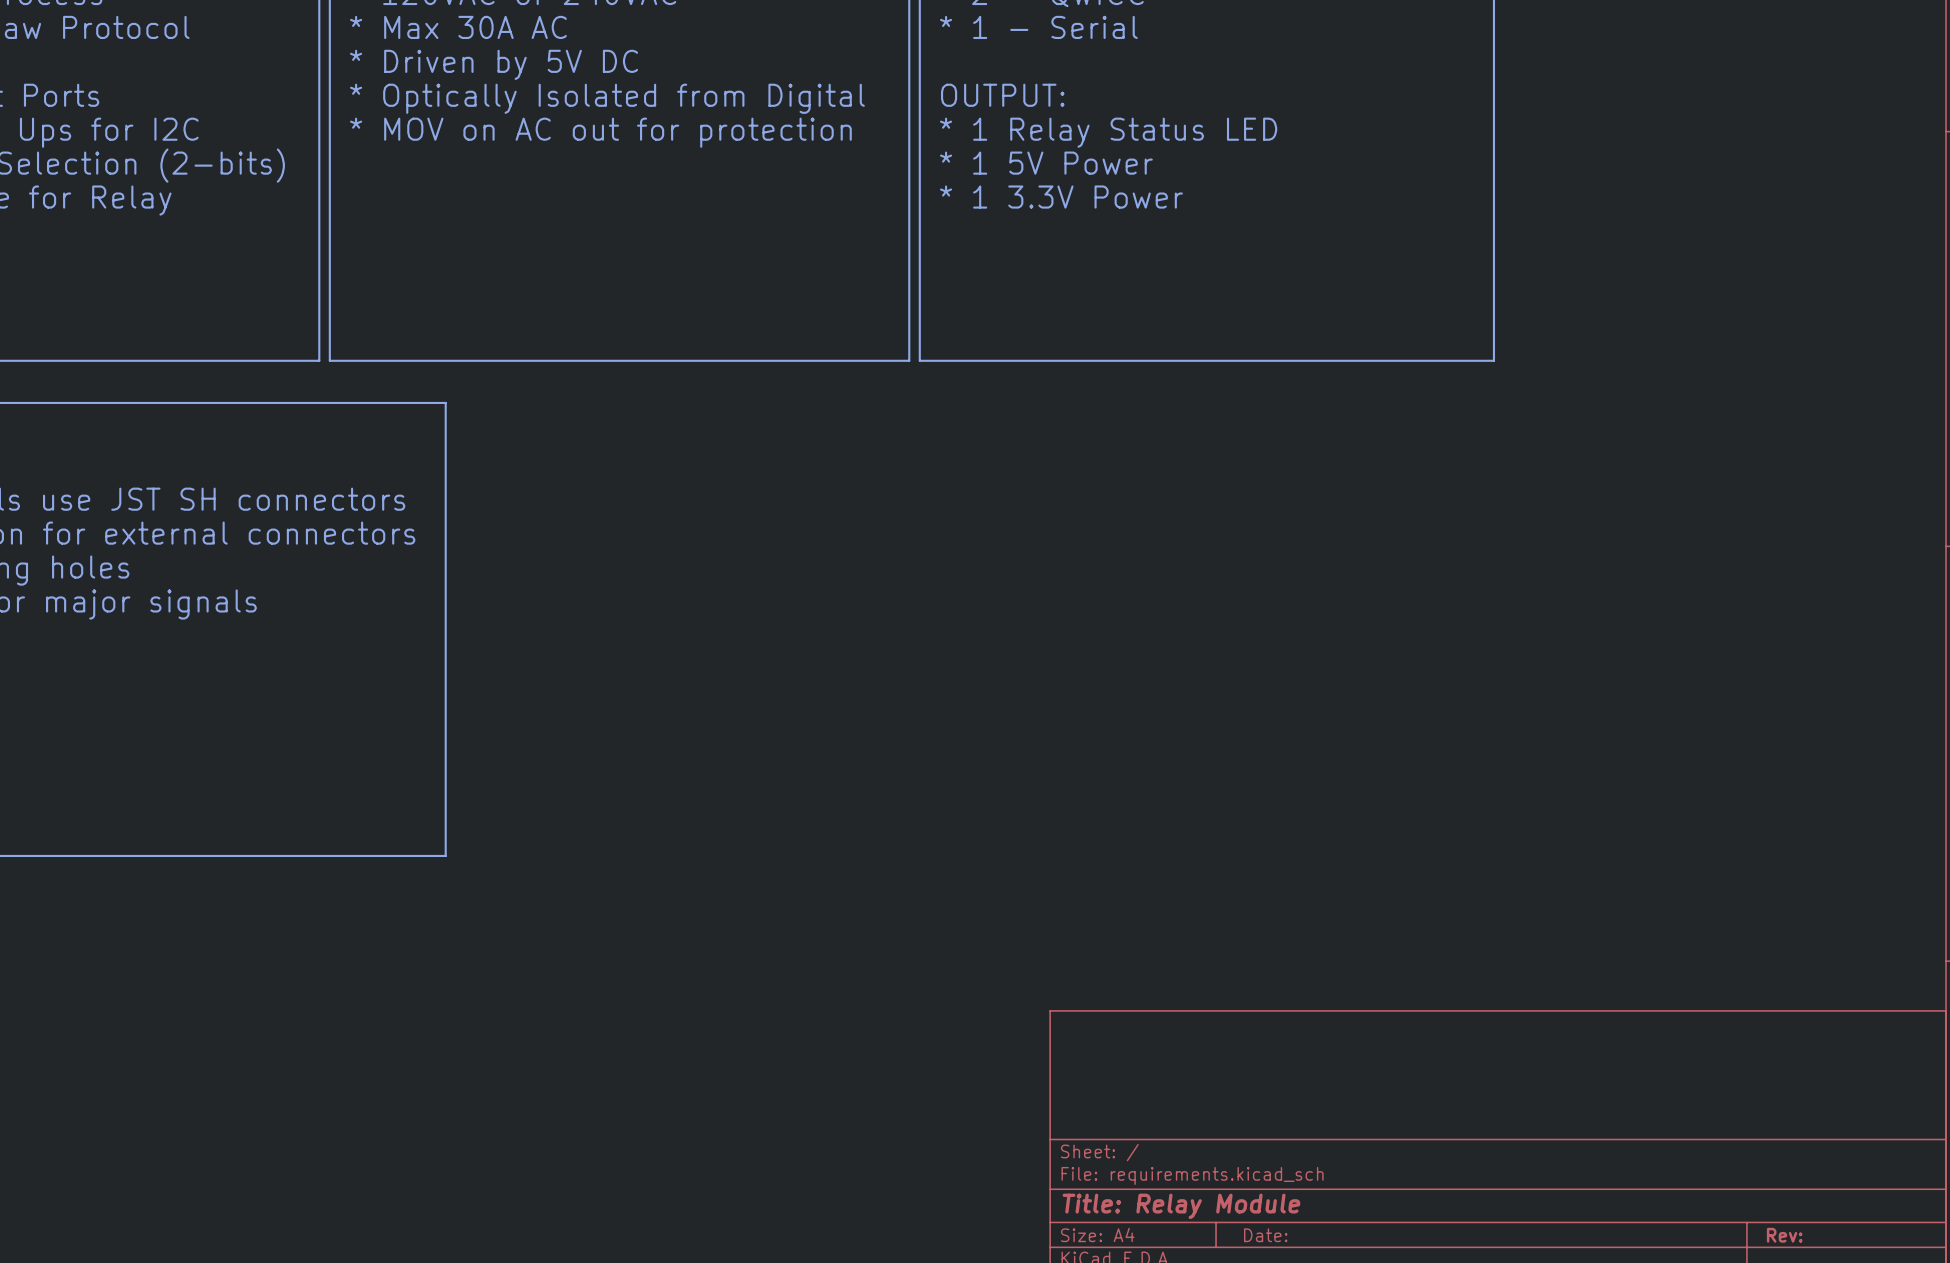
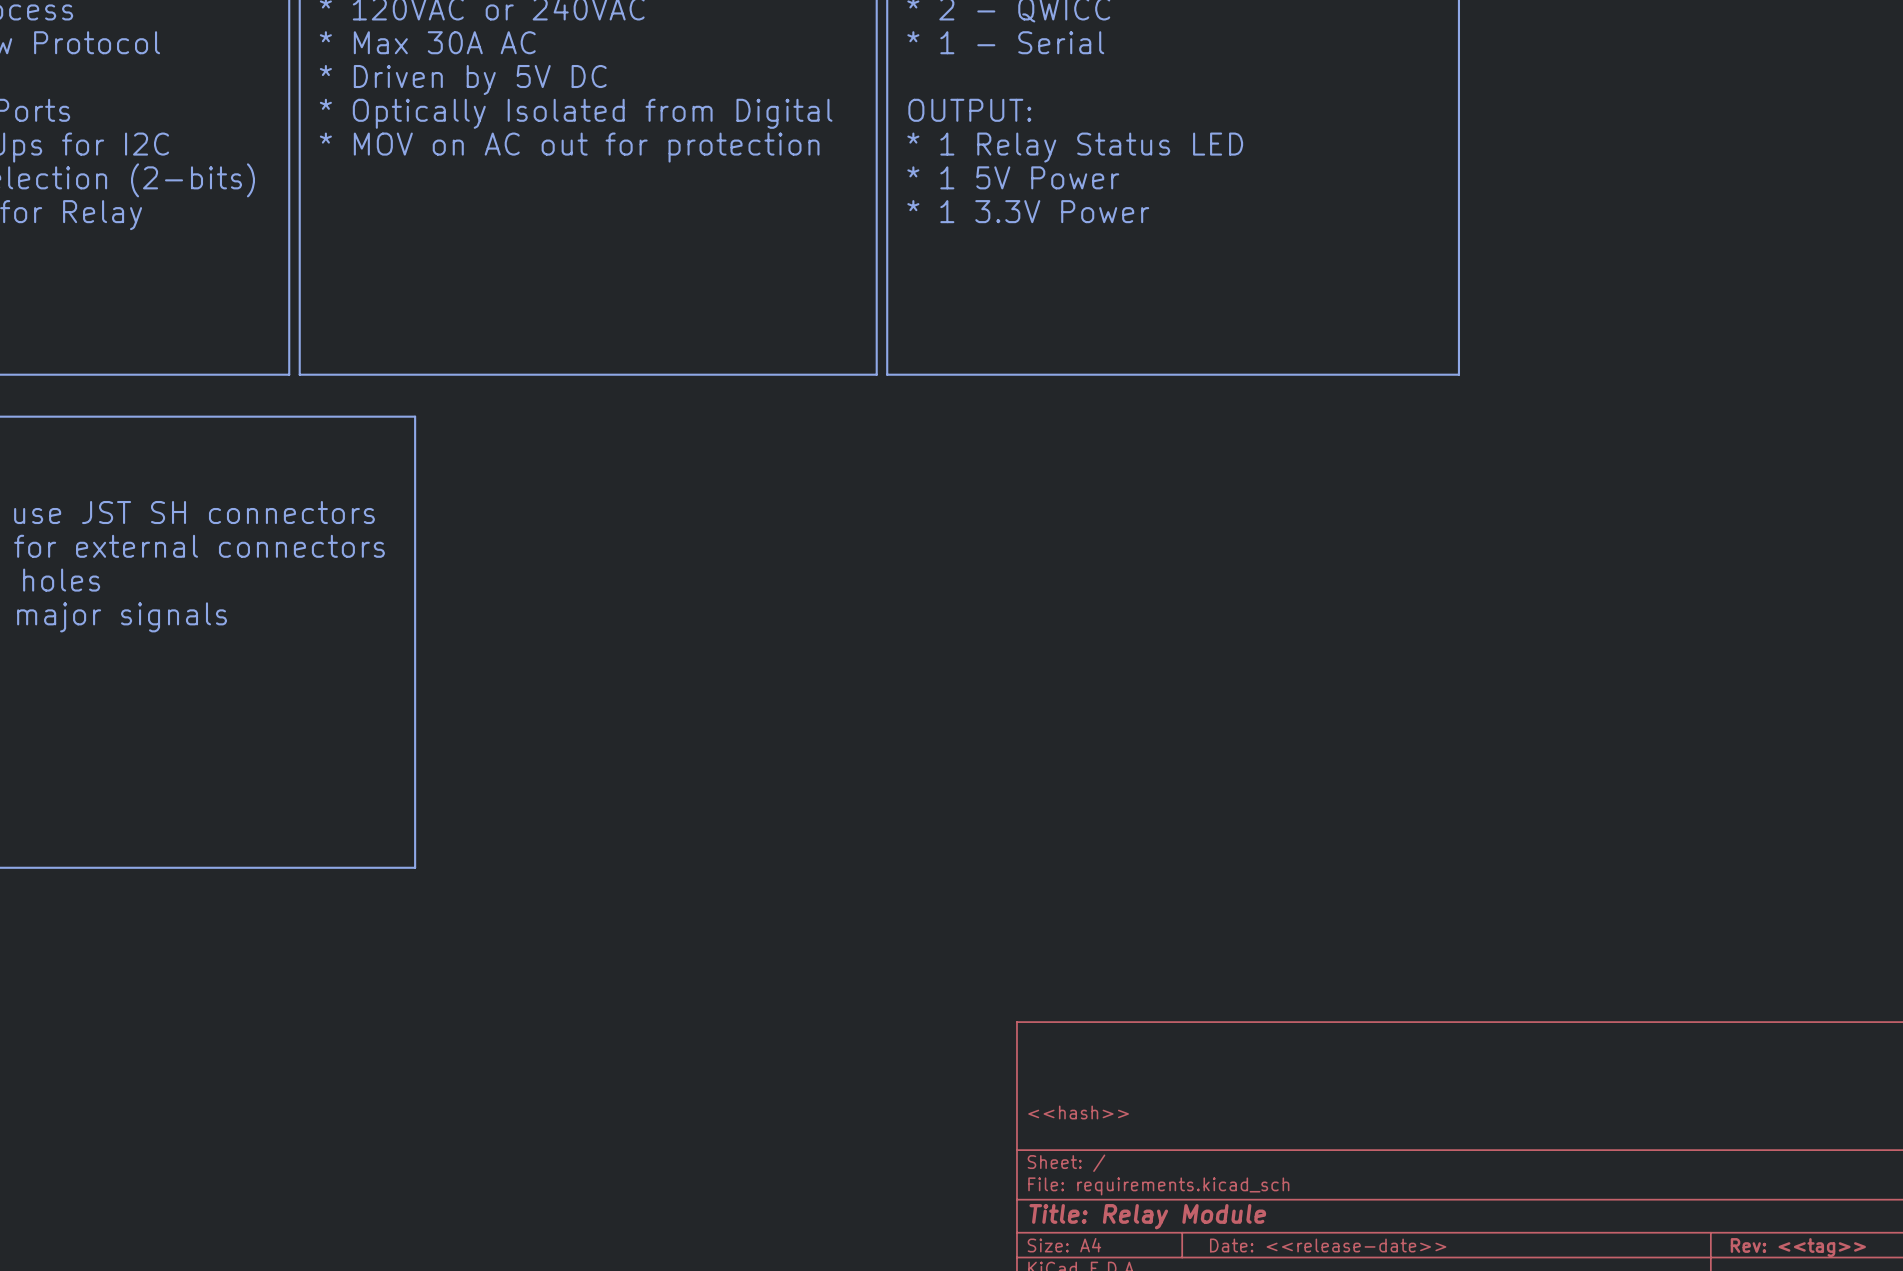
title block: none -> <<hash>> (1078, 1112)
title block: Date: (1265, 1235) -> Date: <<release-date>> (1328, 1245)
title block: Rev: (1784, 1235) -> Rev: <<tag>> (1798, 1247)

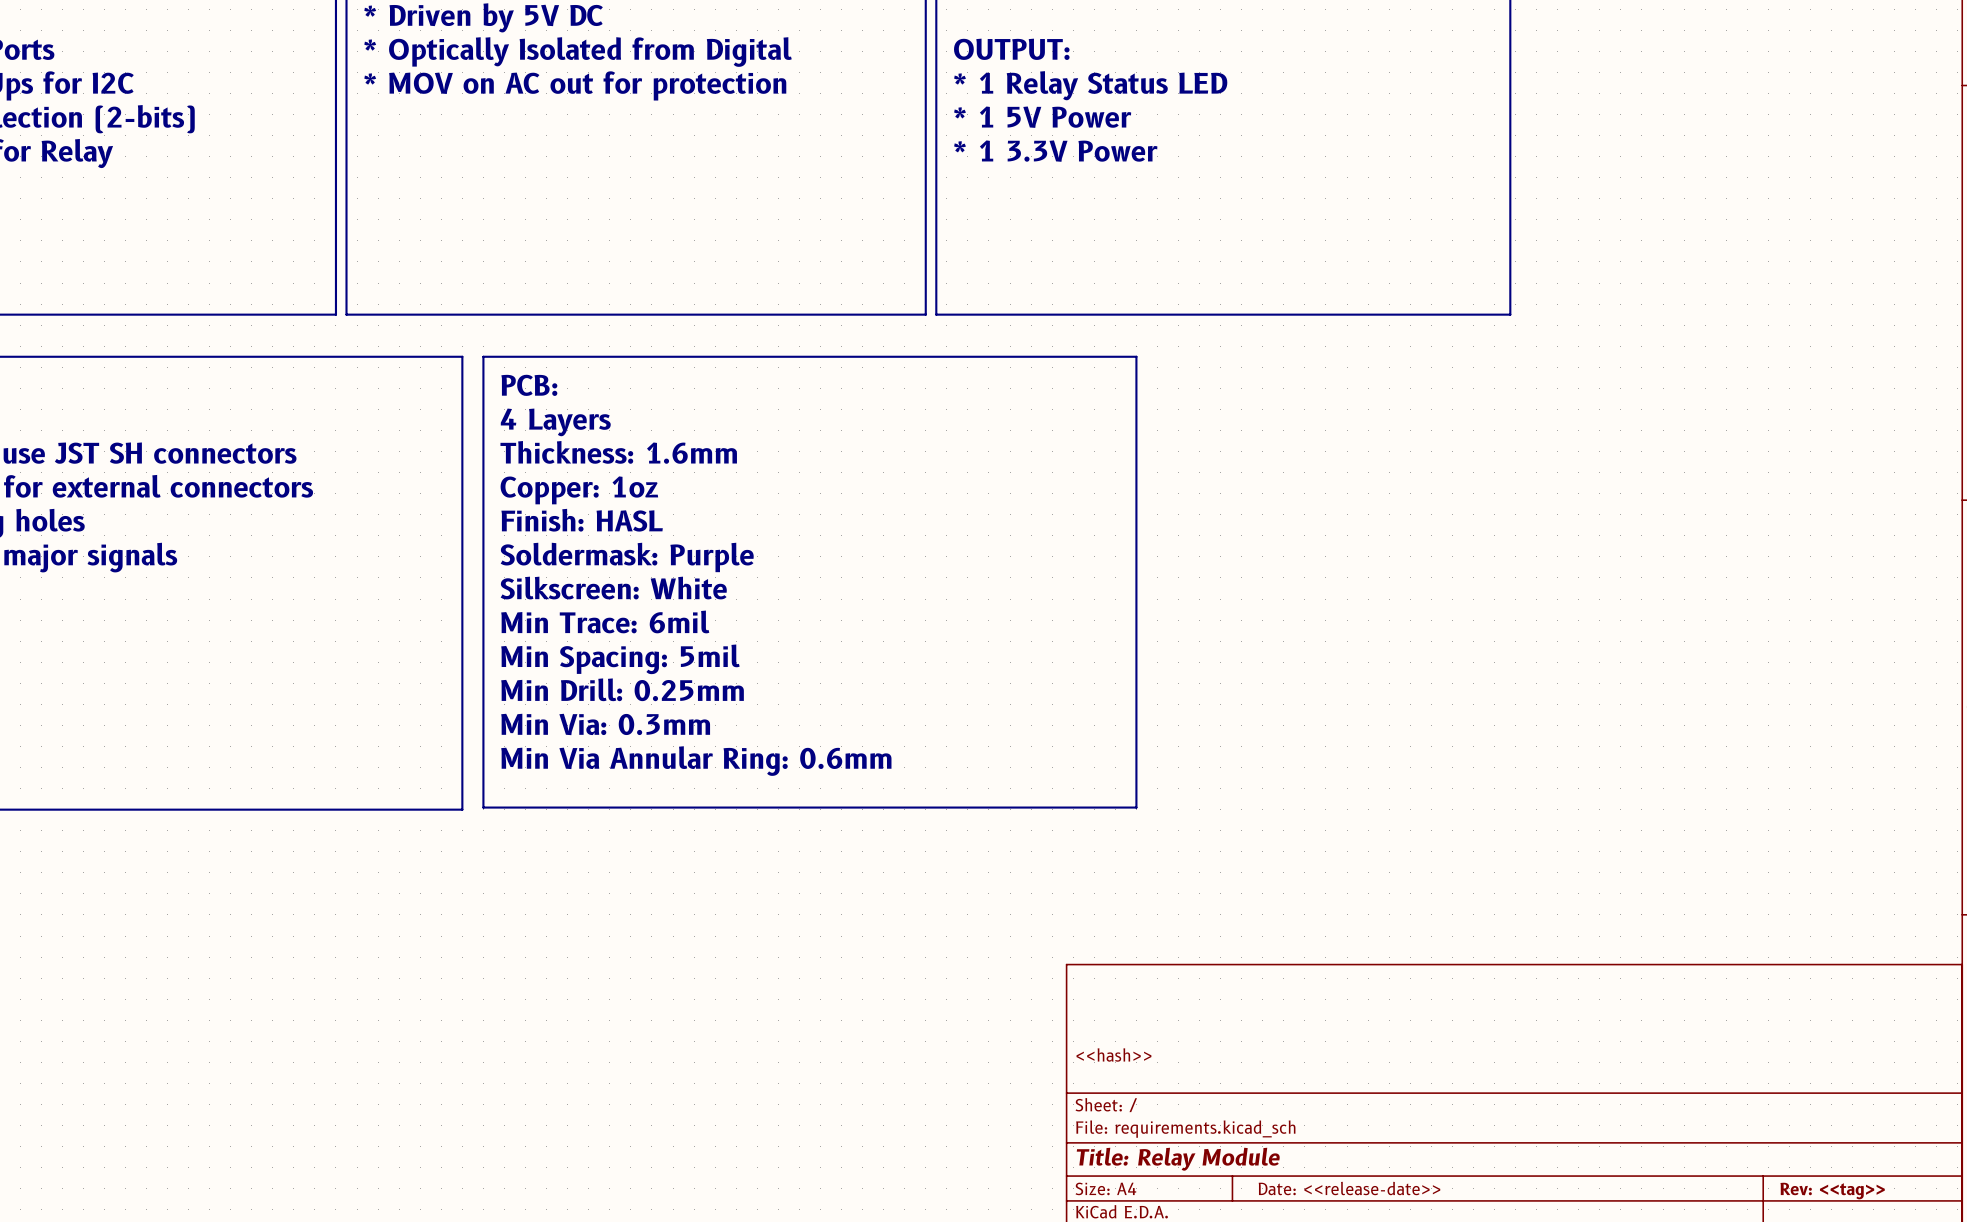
line: none -> (483, 356) (1136, 356) (1136, 807) (483, 807) (483, 356)
text: none -> PCB: (529, 385)
text: none -> 4 Layers (555, 422)
text: none -> Thickness: 1.6mm (618, 452)
text: none -> Copper: 1oz (579, 490)
text: none -> Finish: HASL (582, 520)
text: none -> Soldermask: Purple (627, 557)
text: none -> Silkscreen: White (613, 588)
text: none -> Min Trace: 6mil (605, 621)
text: none -> Min Spacing: 5mil (620, 659)
text: none -> Min Drill: 0.25mm (622, 689)
text: none -> Min Via: 0.3mm (605, 724)
text: none -> Min Via Annular Ring: 0.6mm (696, 761)

